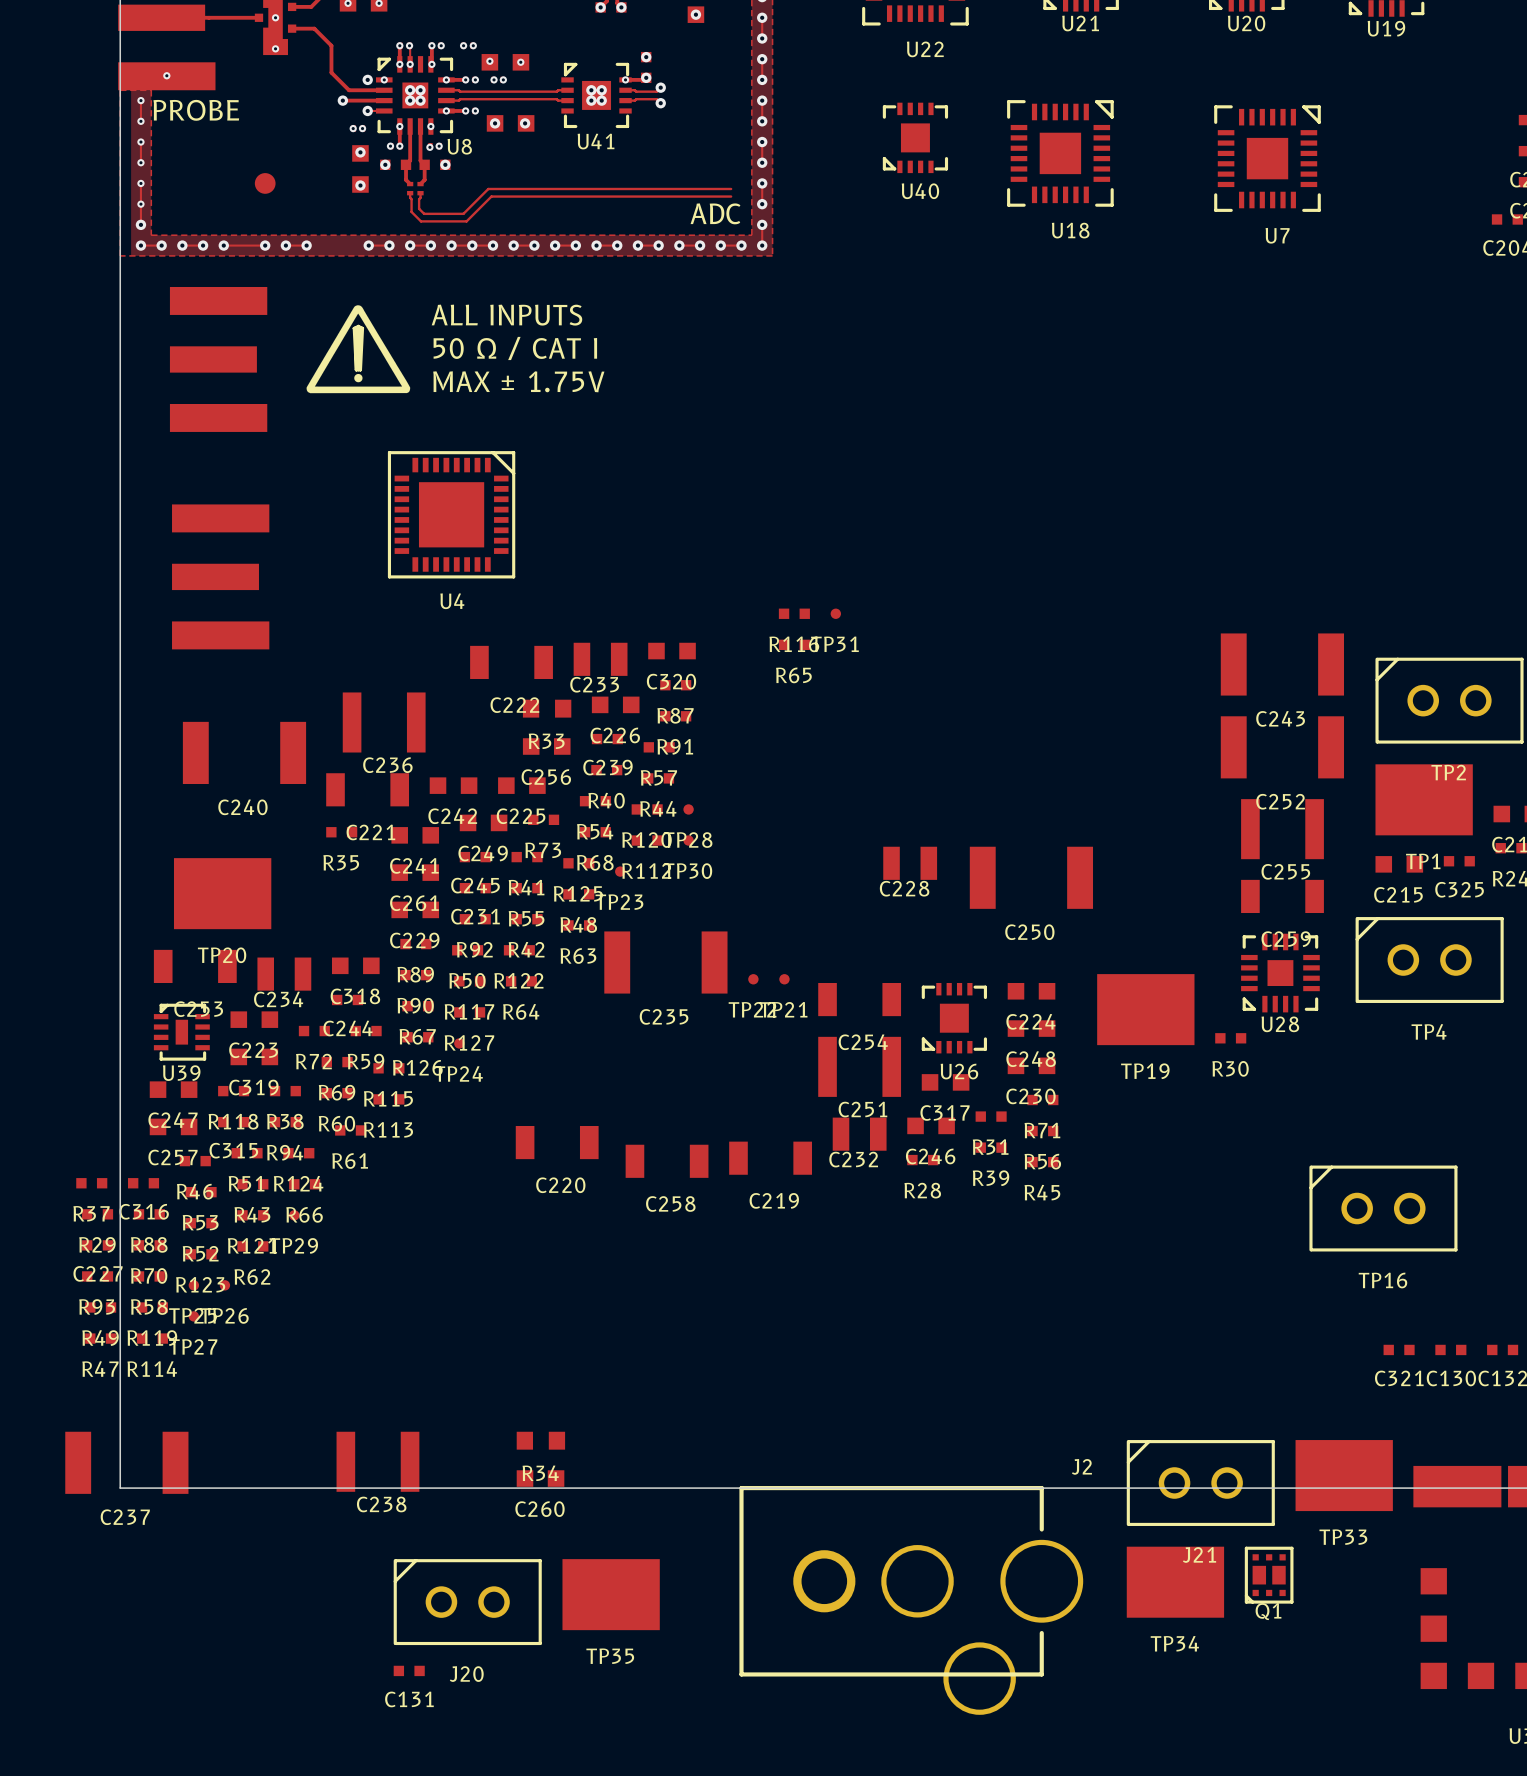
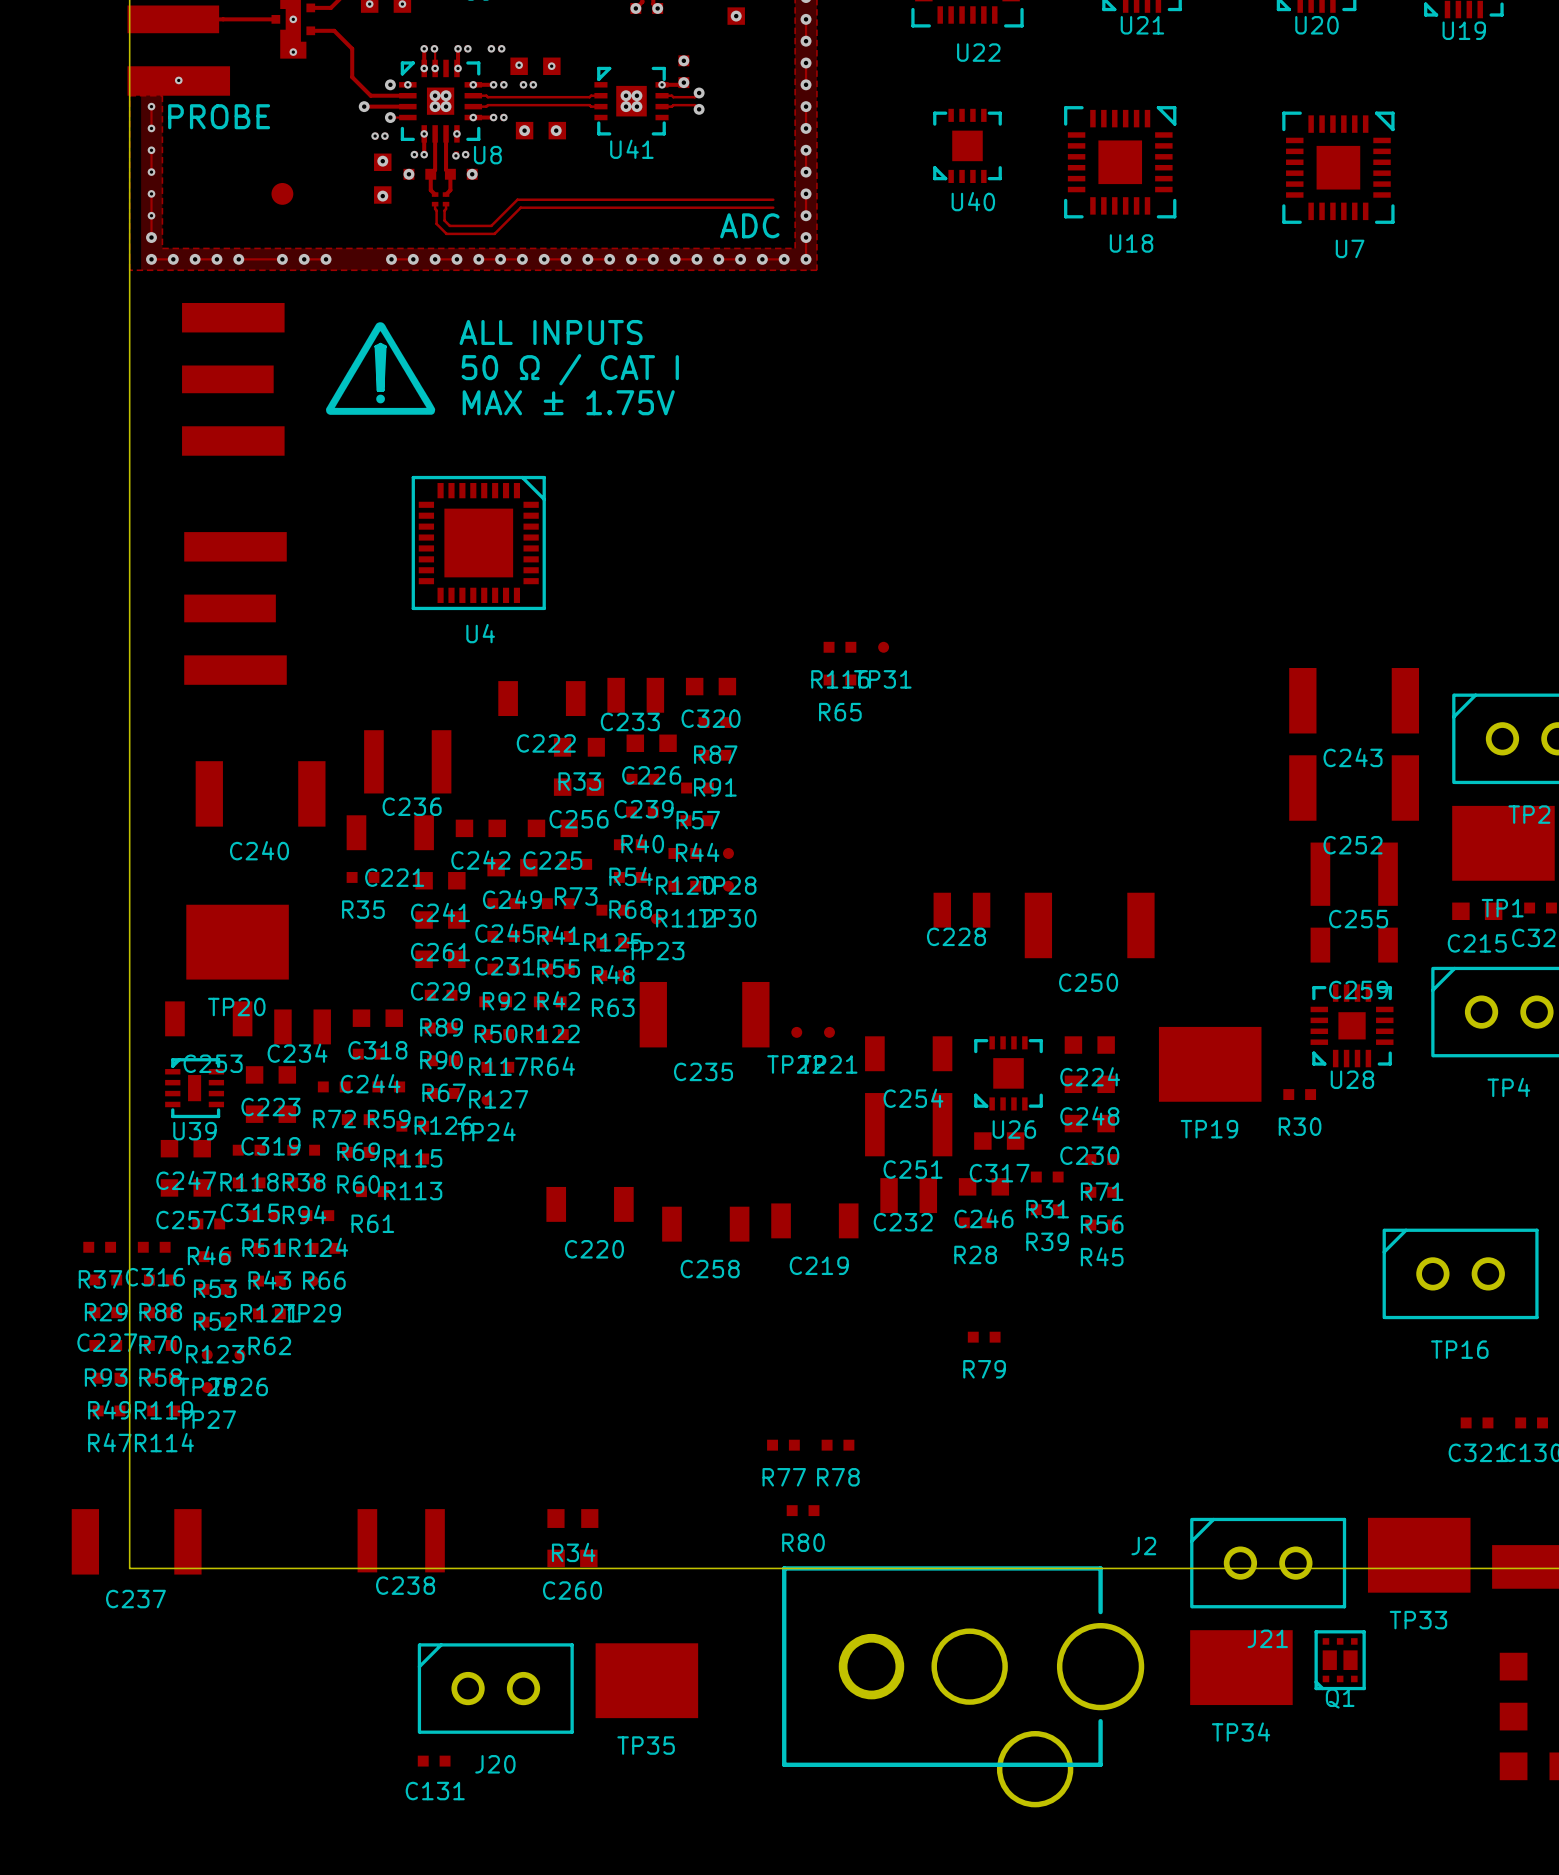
R79: none -> (984, 1337)
R77: none -> (783, 1445)
R78: none -> (838, 1445)
R80: none -> (803, 1510)

